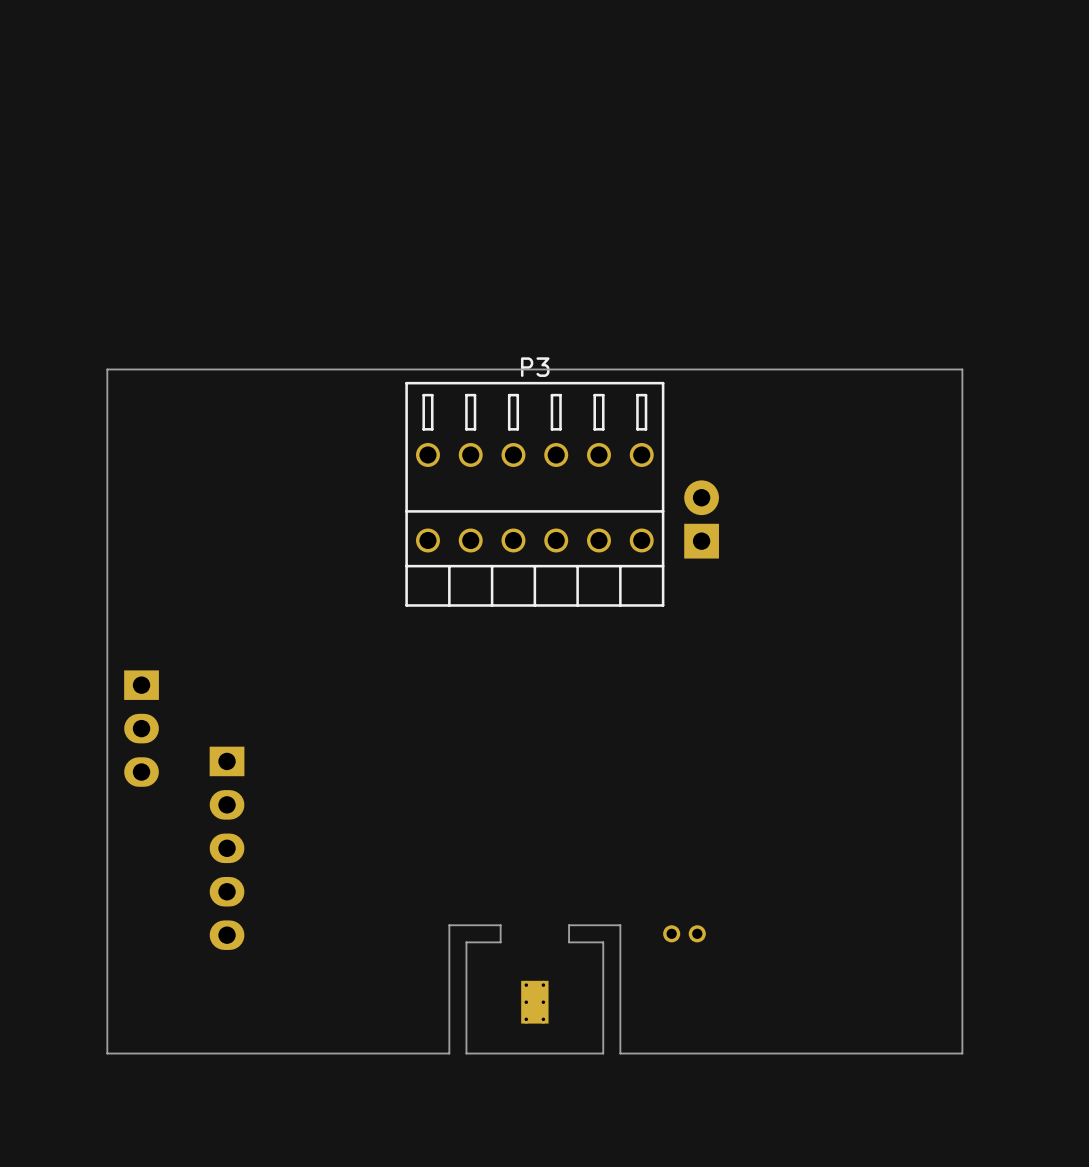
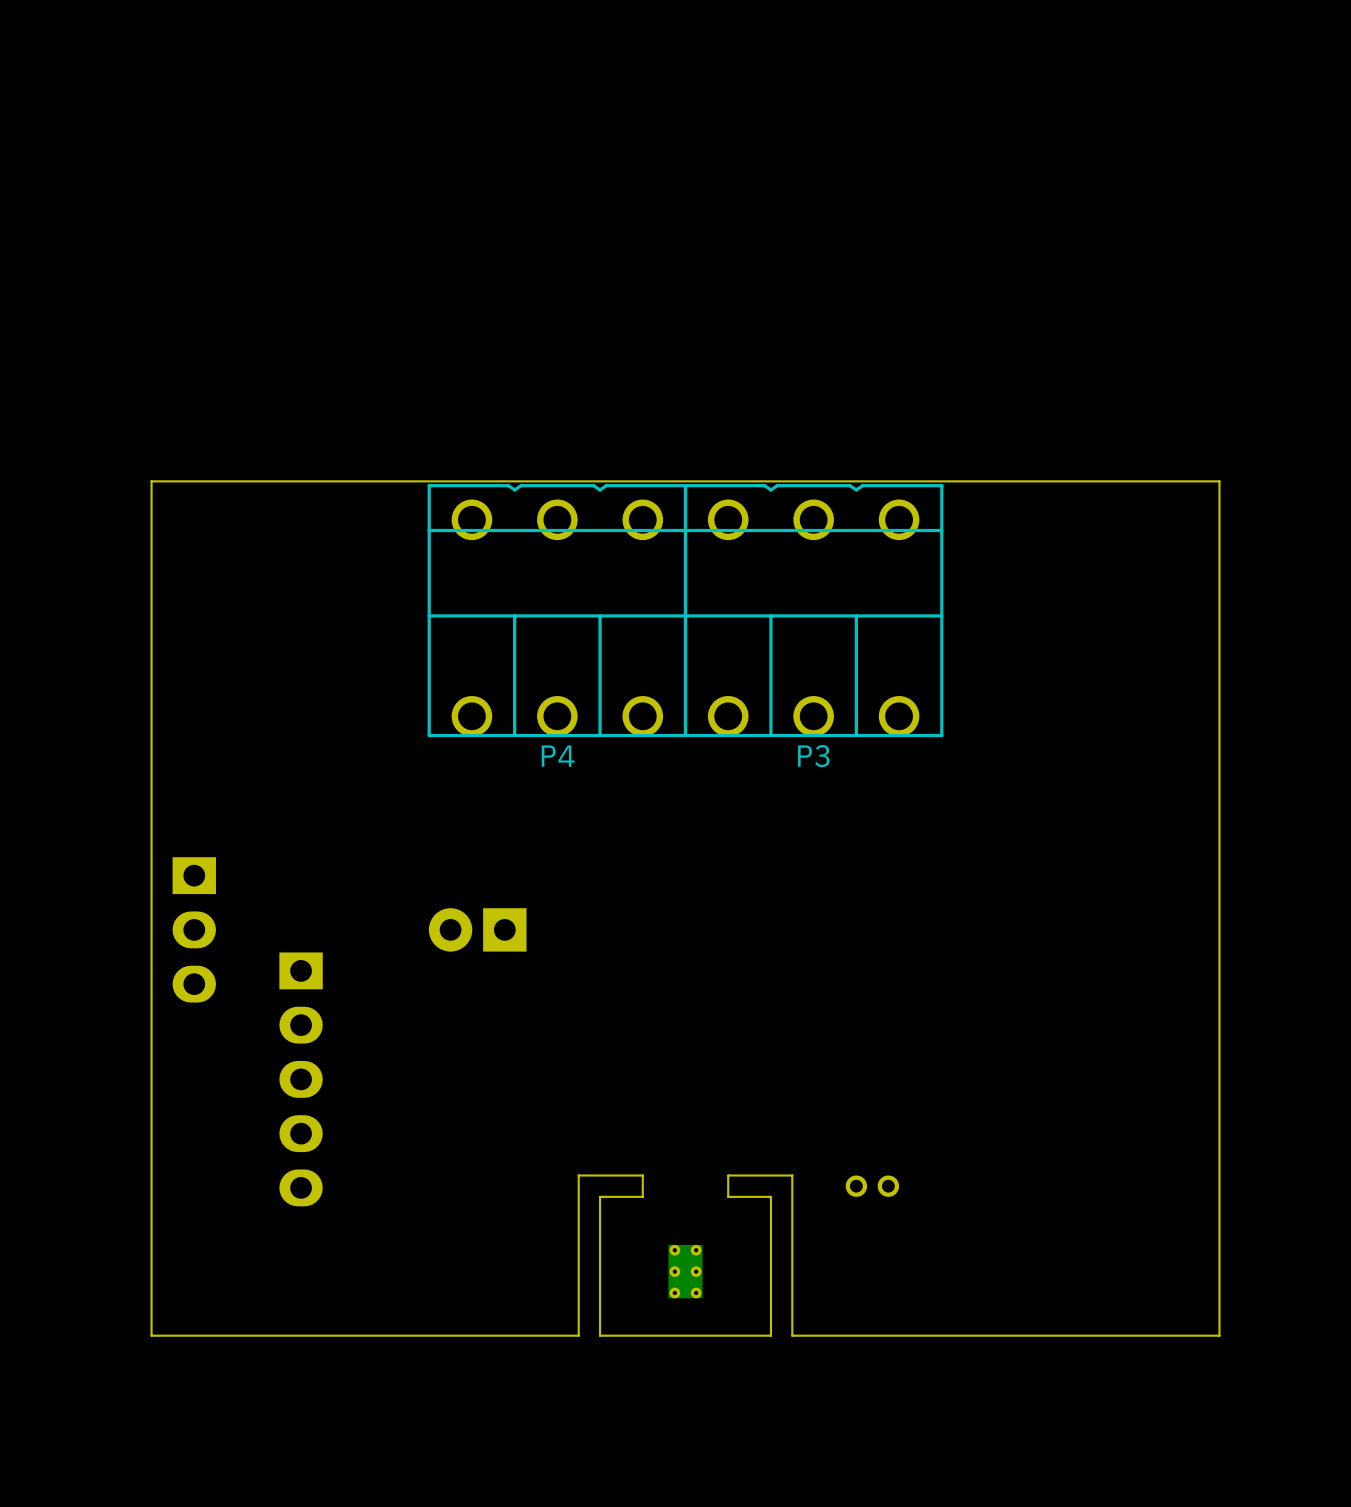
P3 name position: P3 (535, 367) -> P3 (813, 756)
P3 footprint: [405, 381, 665, 607] -> [683, 484, 944, 738]
P4: none -> (557, 610)
part rotation: 0° (701, 519) -> 90° counterclockwise (477, 929)
part position: (701, 519) -> (477, 929)

